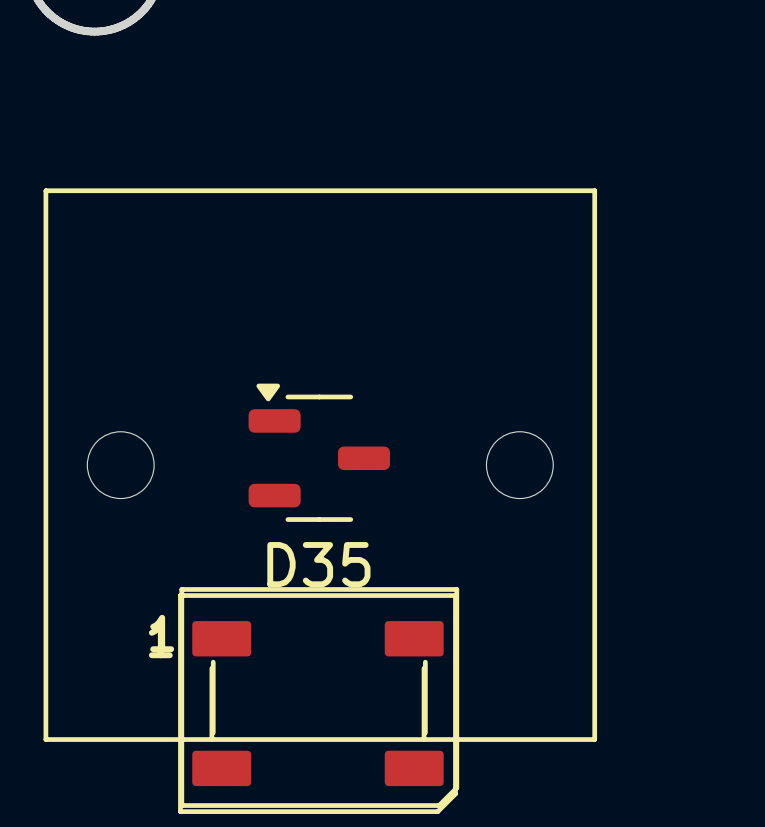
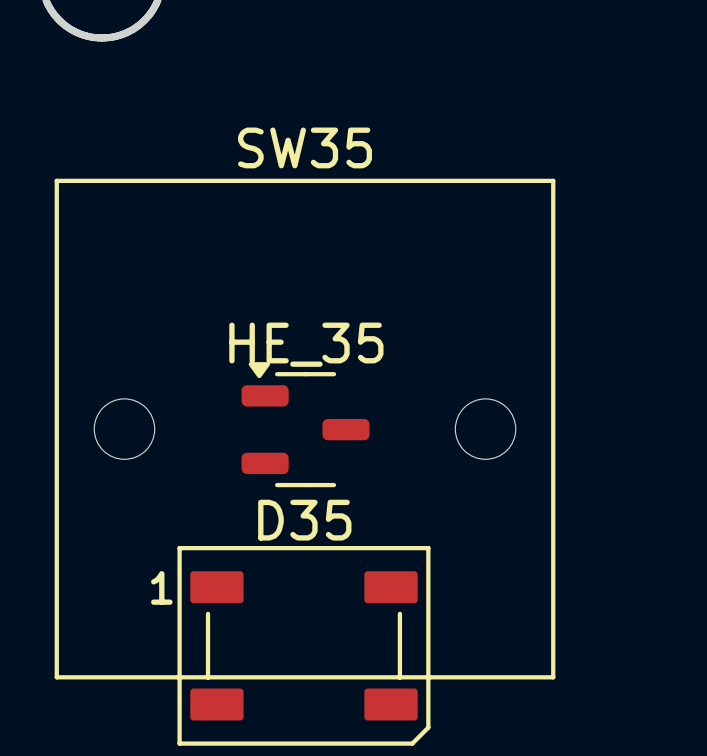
HE_35: none -> (305, 424)
SW35: none -> (305, 429)
part: (320, 498) -> none

